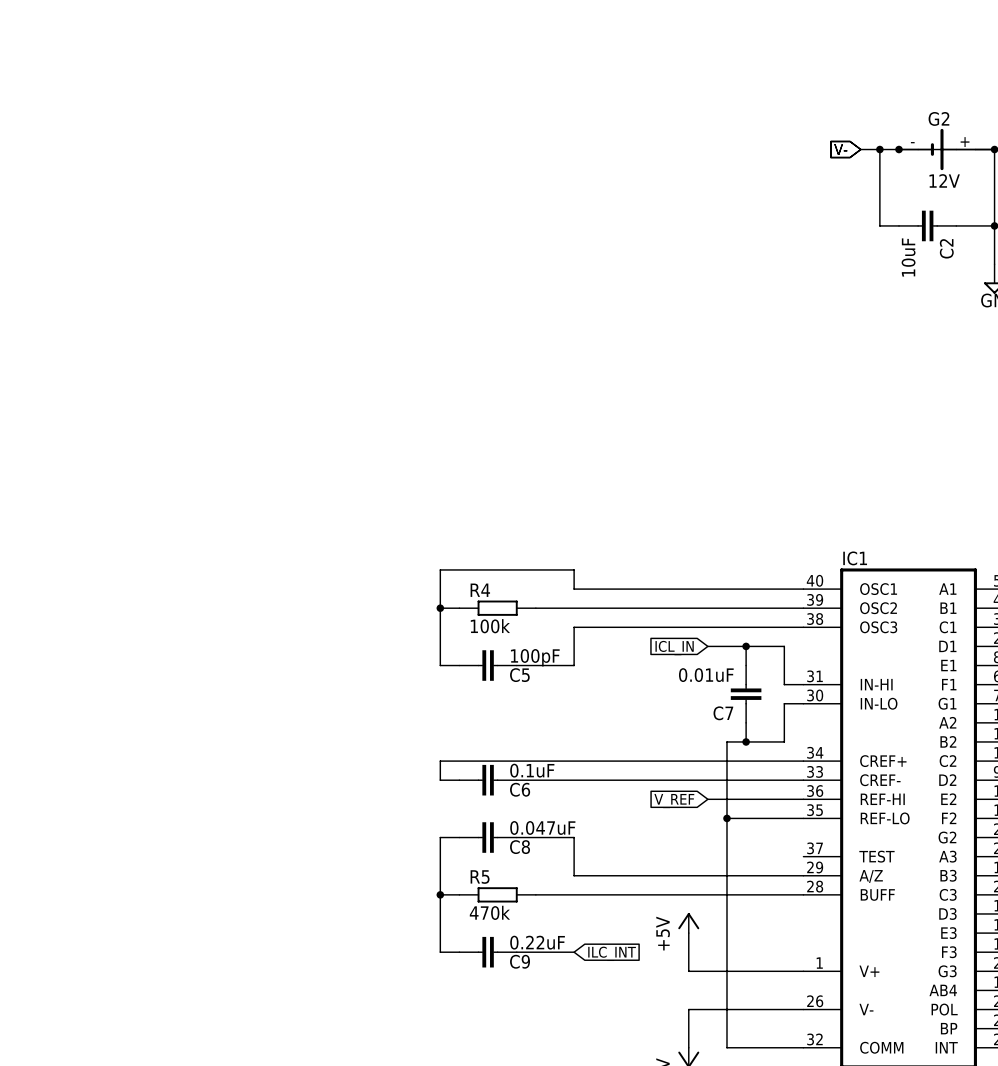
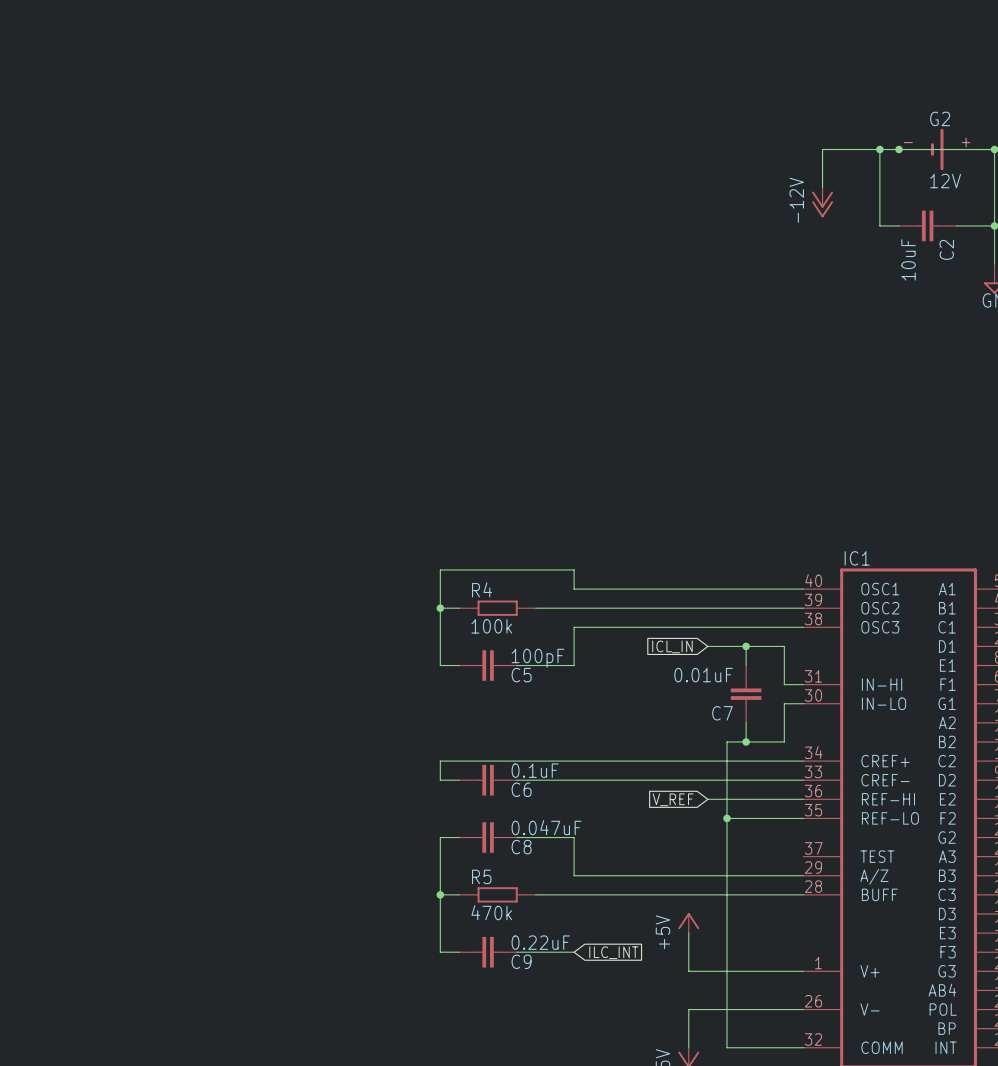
global label: V- (840, 149) -> none
wire: none -> (860, 149) (822, 149) (822, 187)
power symbol: none -> -12V (822, 202)

